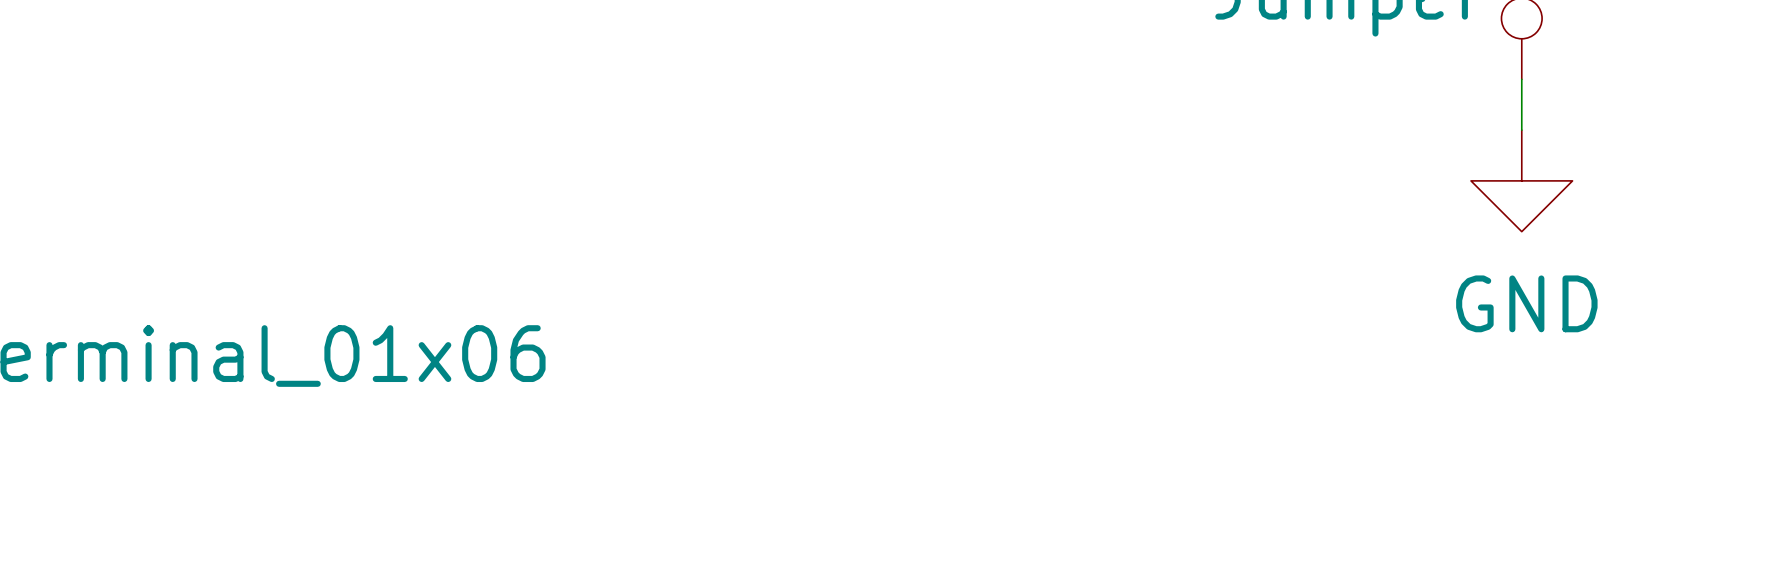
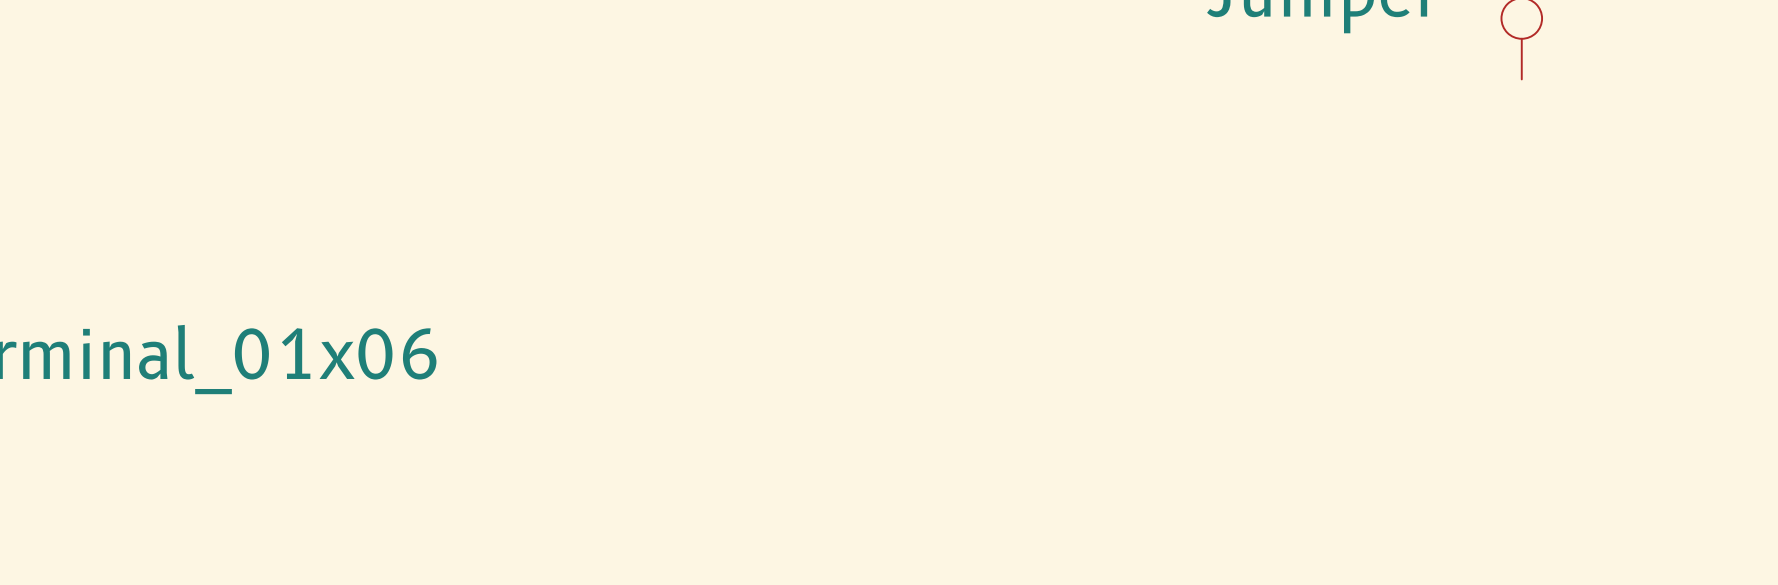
wire: (1521, 79) (1521, 130) -> none
power symbol: GND (1521, 180) -> none

